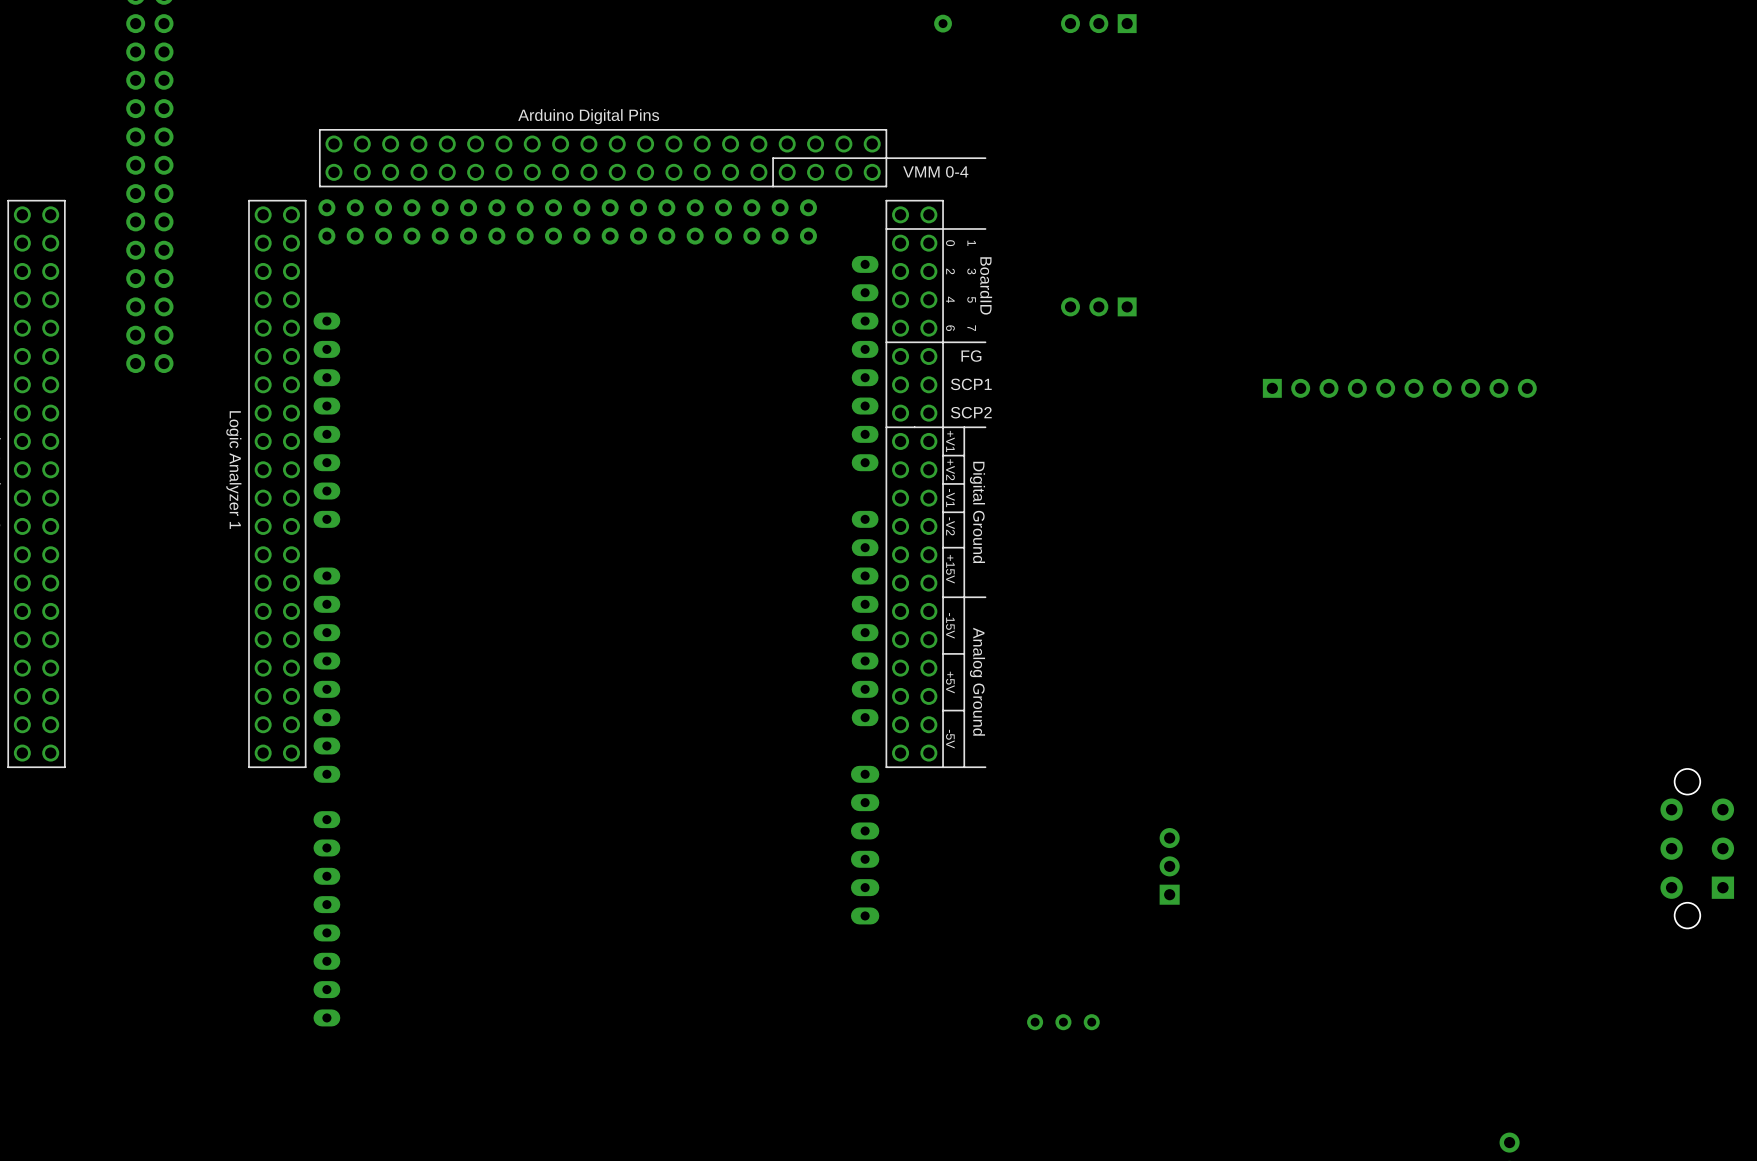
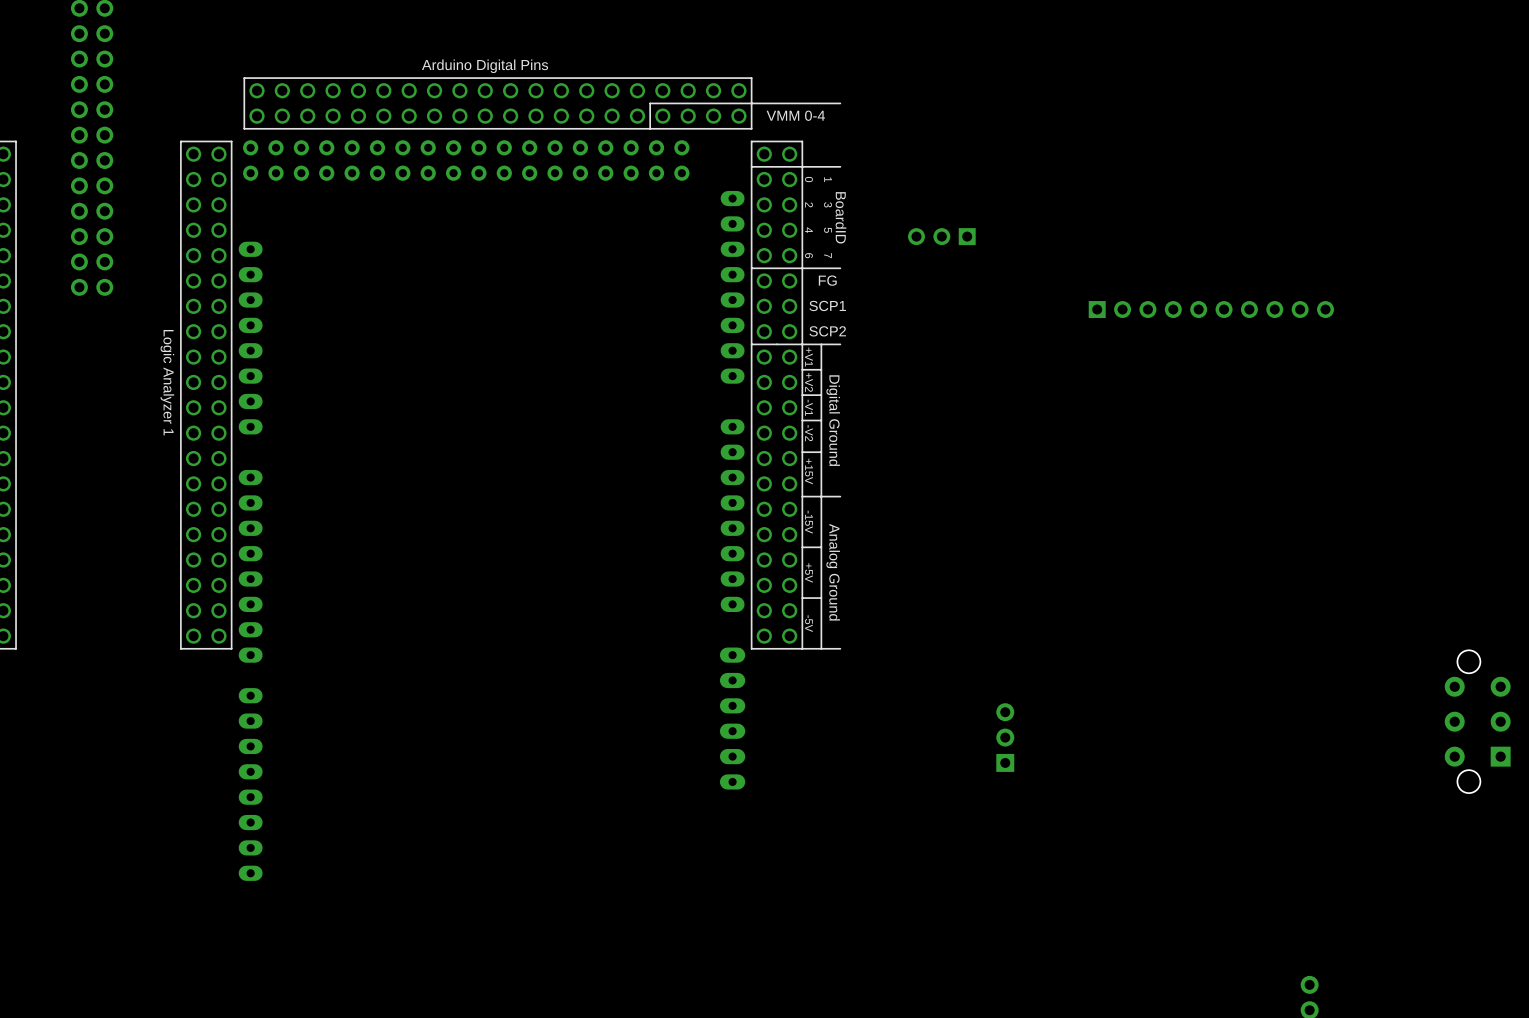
part: (1063, 1022) -> none

